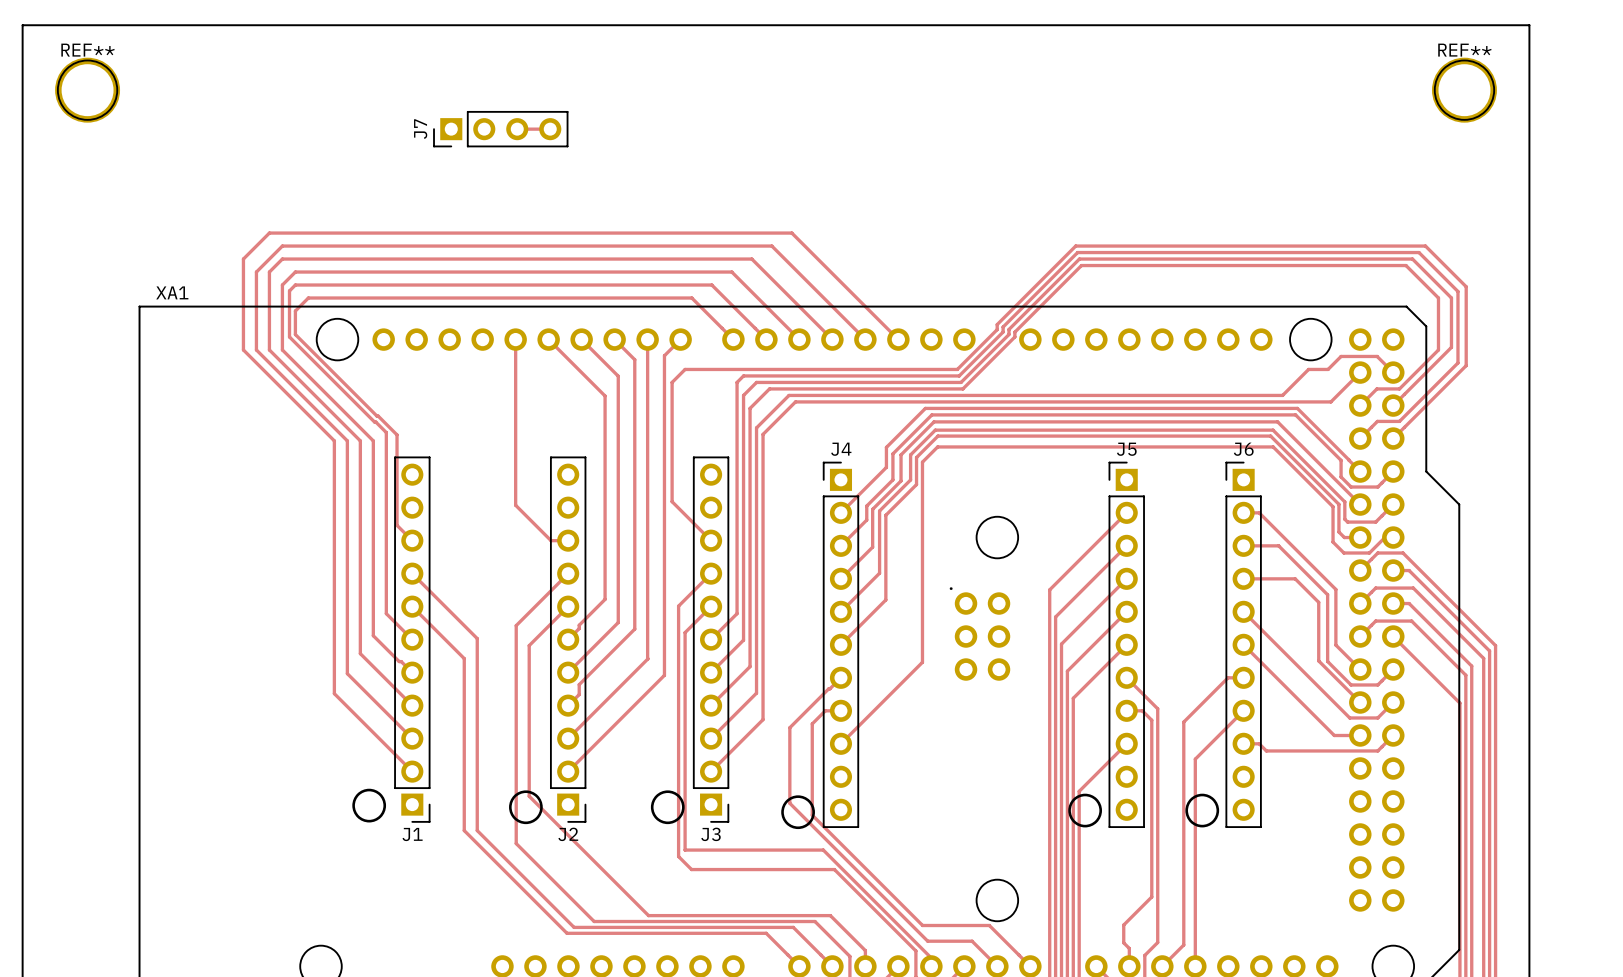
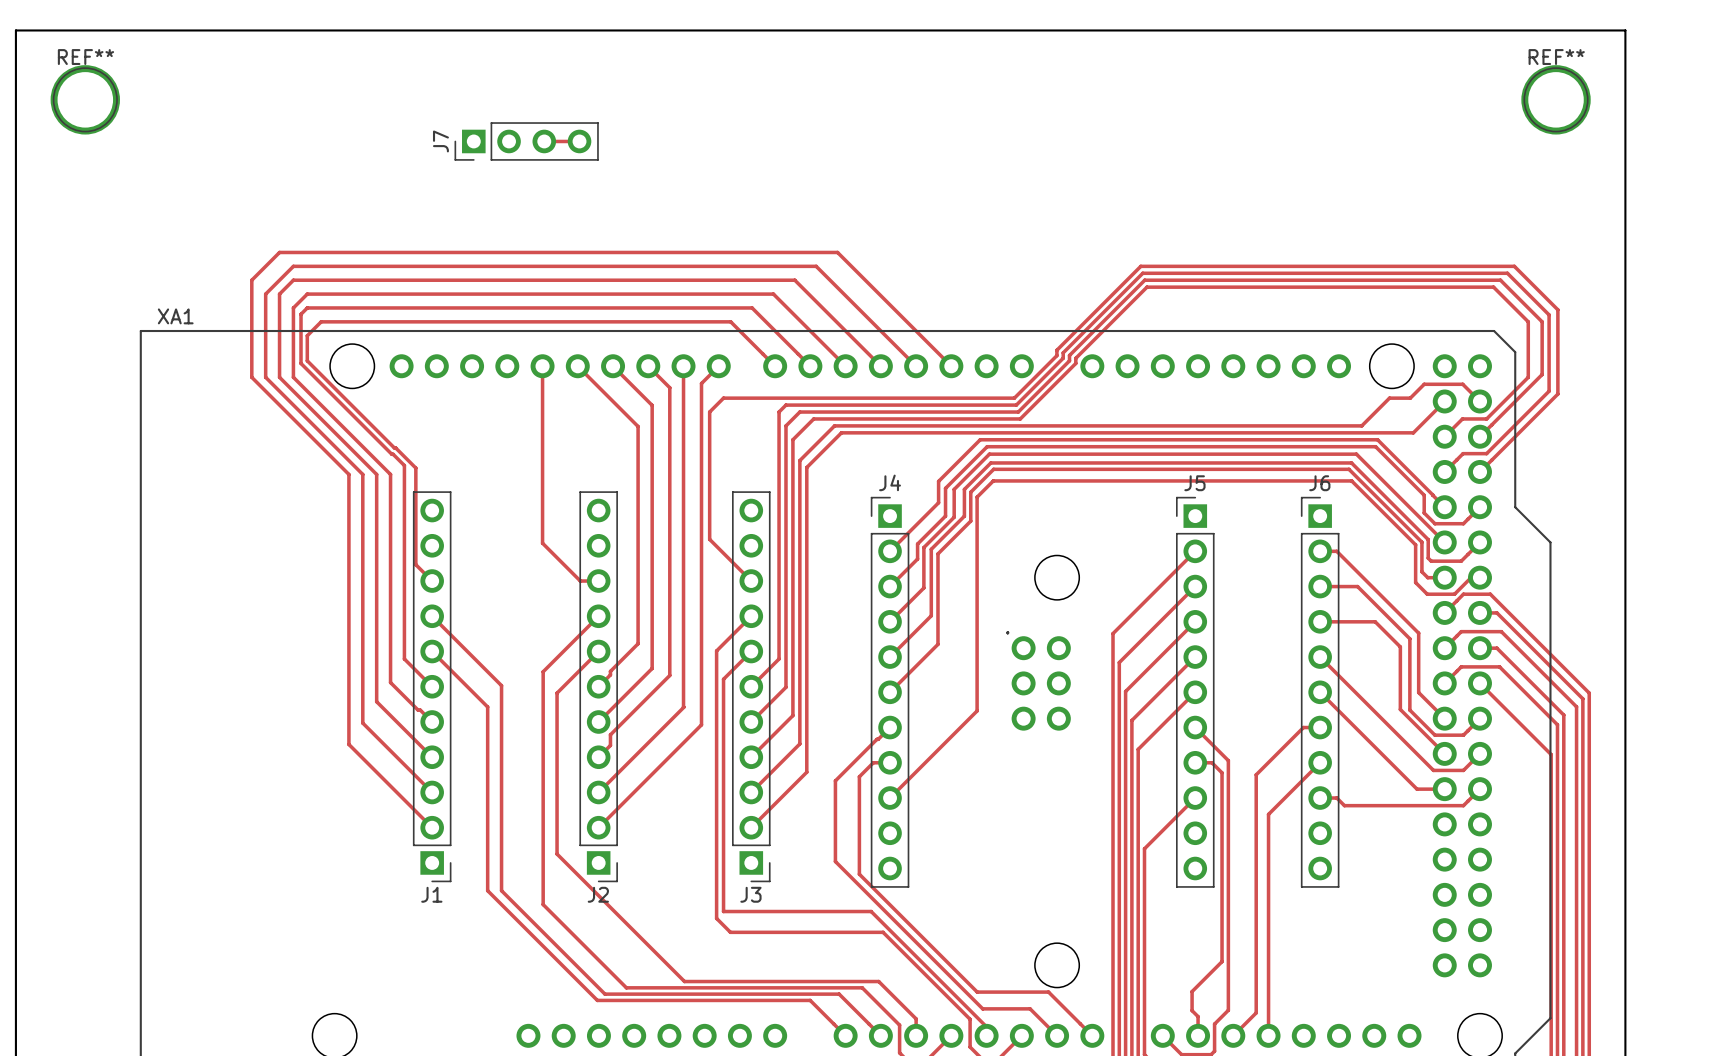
drawing: [352, 788, 387, 823] -> none
drawing: [509, 790, 543, 825] -> none
drawing: [650, 790, 685, 825] -> none
drawing: [1068, 793, 1102, 828] -> none
drawing: [1185, 793, 1220, 828] -> none
drawing: [781, 795, 815, 830] -> none

